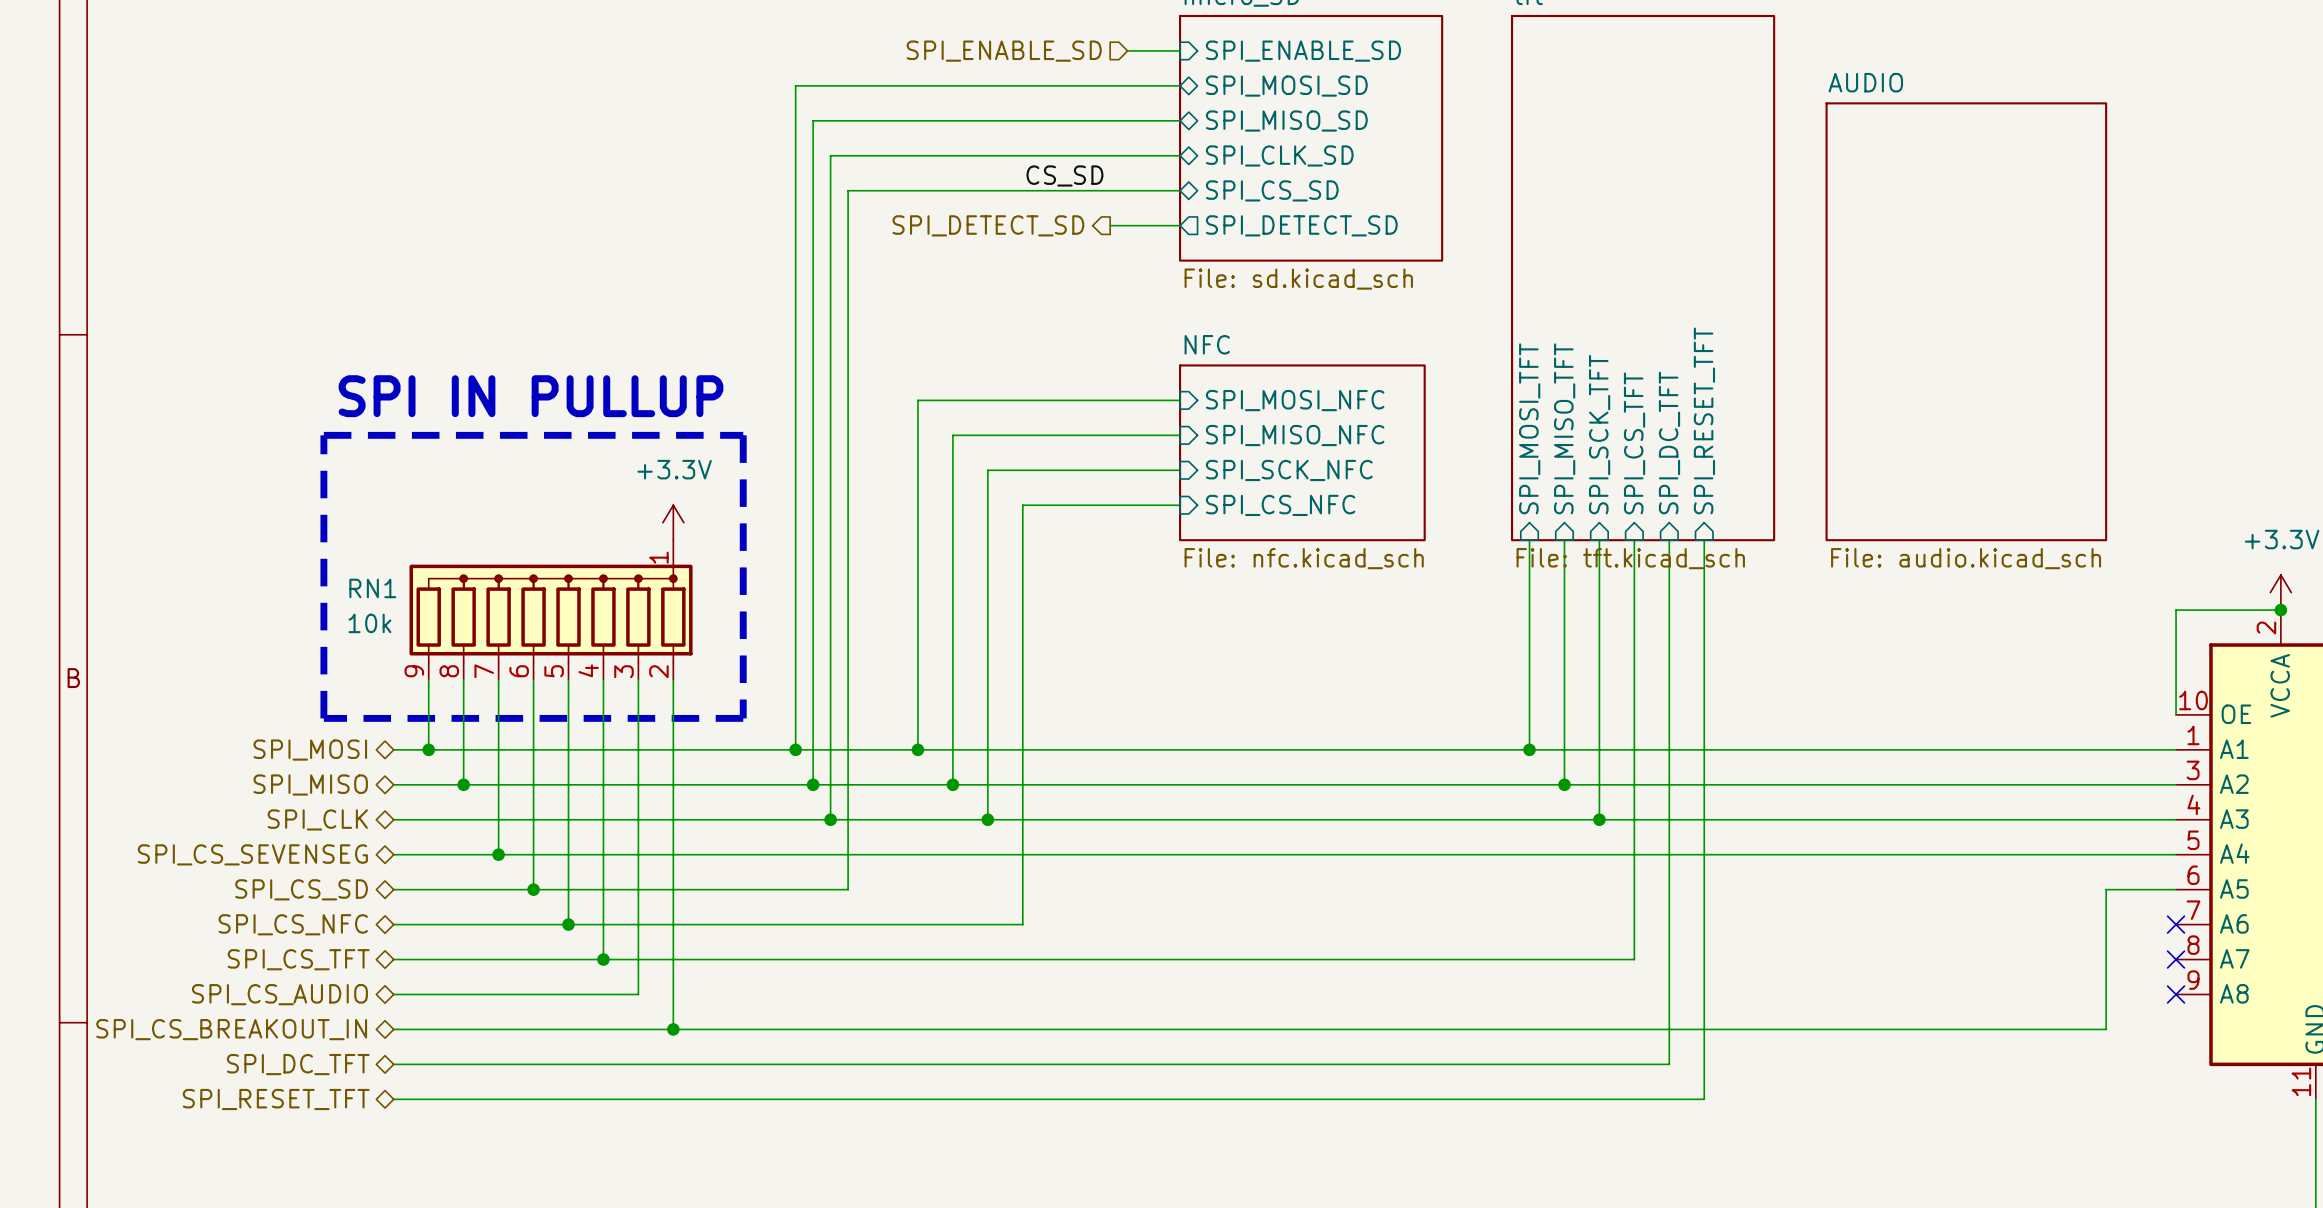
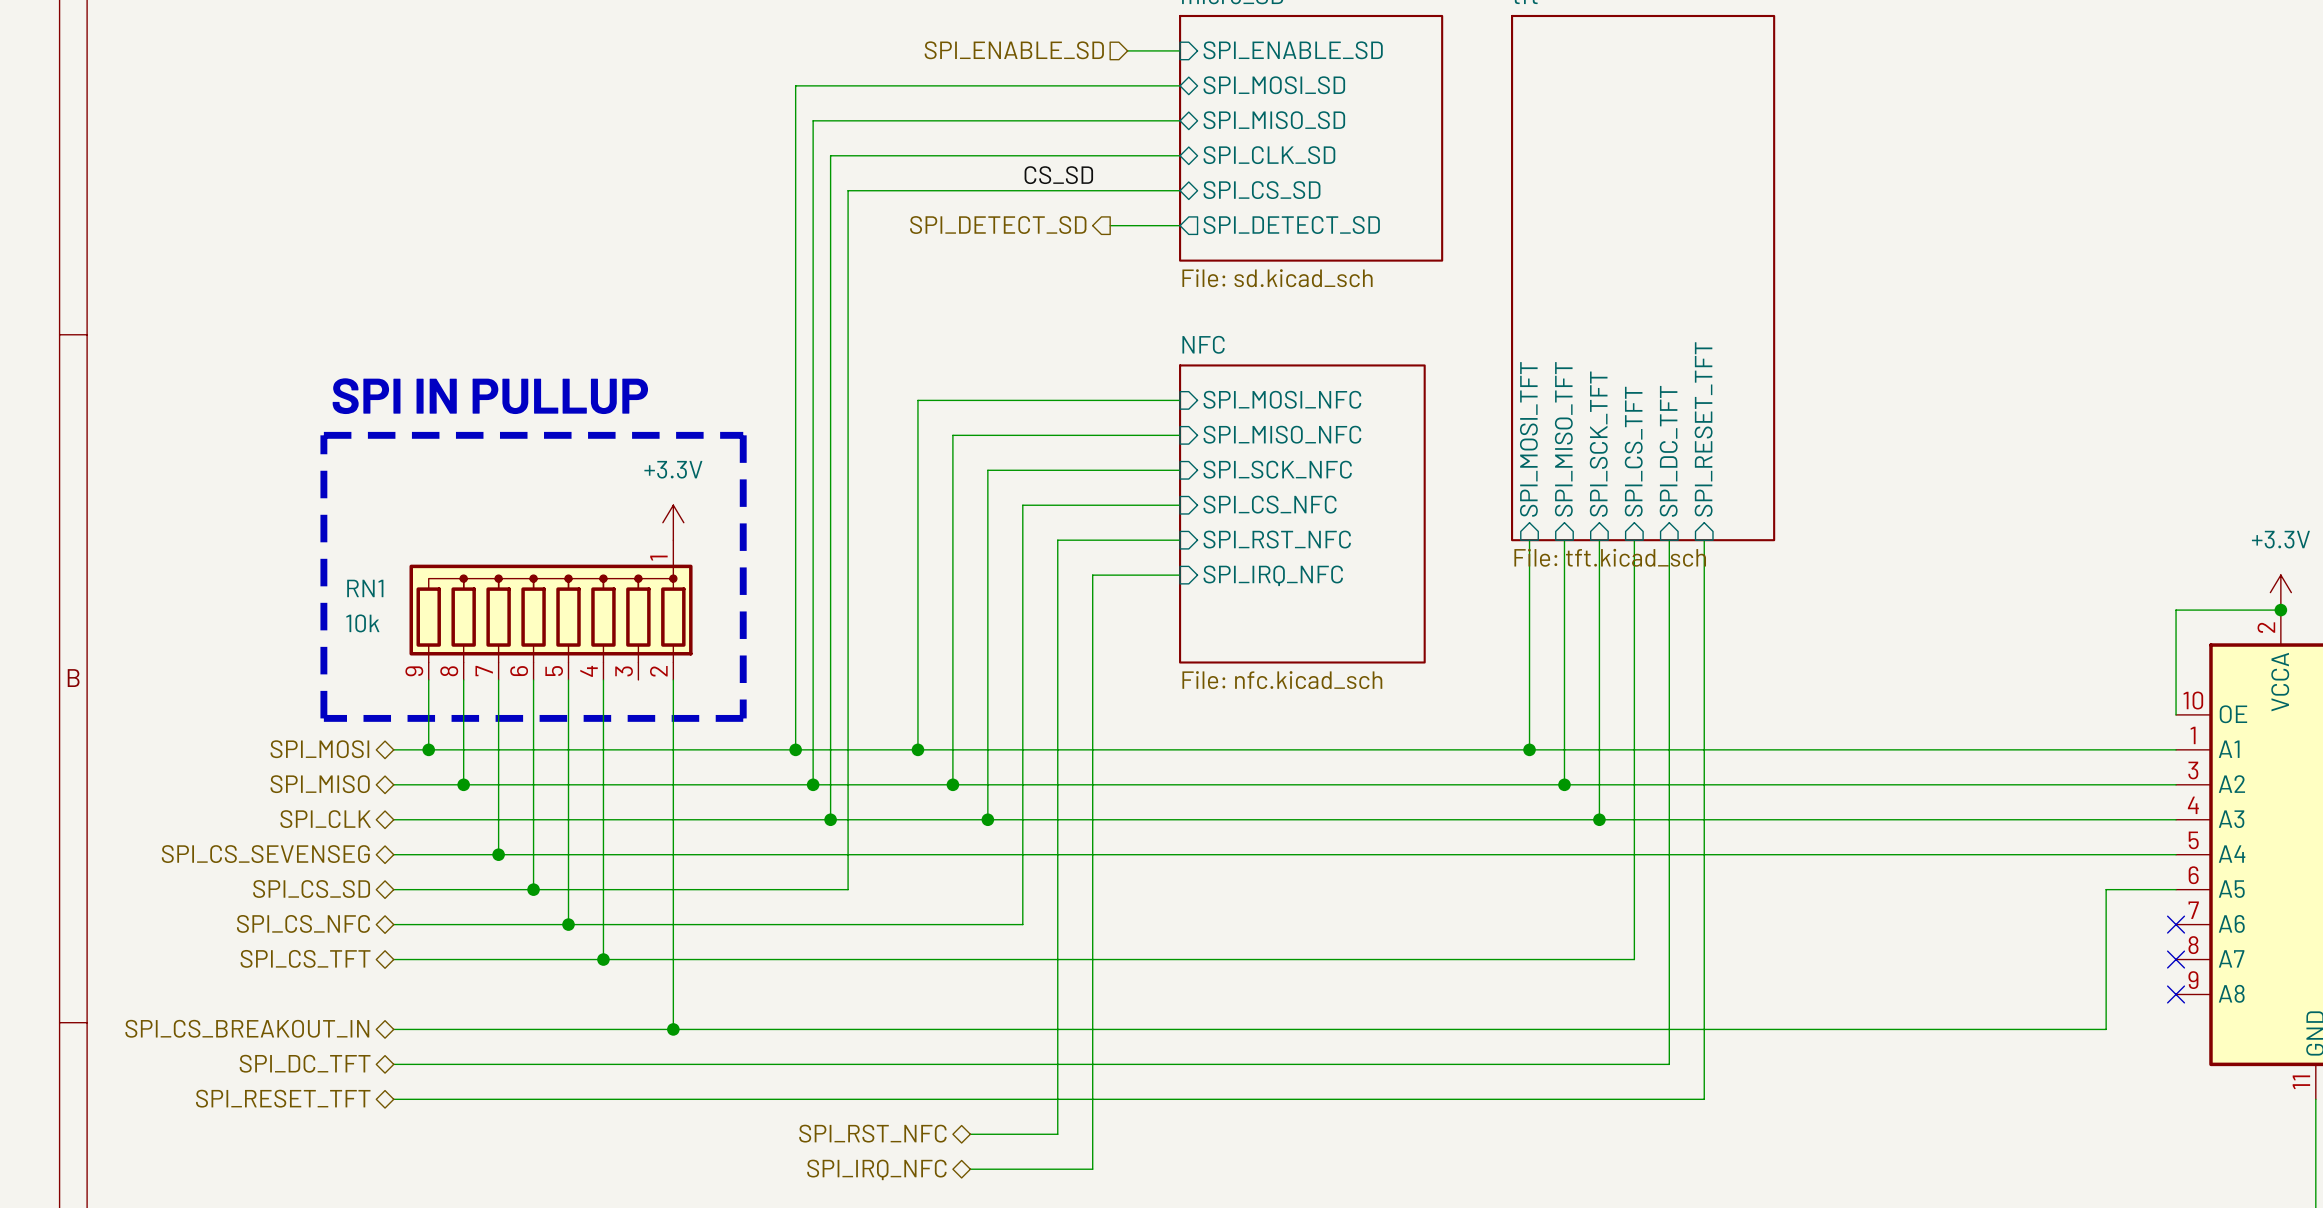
sheet AUDIO: File: audio.kicad_sch (1966, 321) -> none
sheet NFC: File: nfc.kicad_sch (1302, 452) -> none
sheet NFC: none -> File: nfc.kicad_sch (1302, 513)
wire: none -> (1180, 540) (1057, 540) (1057, 1134) (970, 1134)
sheet pin: none -> SPI_RST_NFC (1277, 539)
wire: none -> (1180, 575) (1092, 575) (1092, 1169) (970, 1169)
sheet pin: none -> SPI_IRQ_NFC (1273, 575)
wire: (638, 679) (638, 994) (393, 994) -> none
hierarchical label: SPI_CS_AUDIO (279, 994) -> none
hierarchical label: none -> SPI_RST_NFC (872, 1133)
hierarchical label: none -> SPI_IRQ_NFC (876, 1169)

